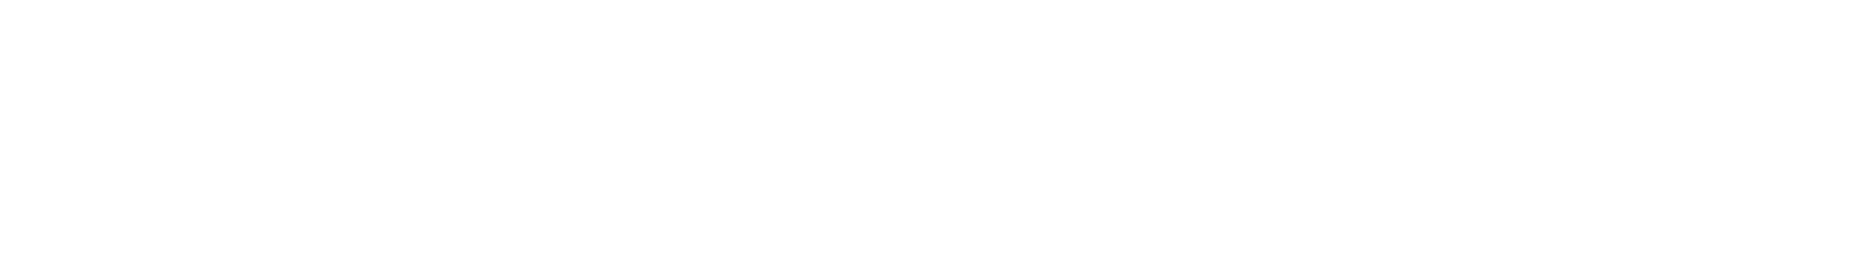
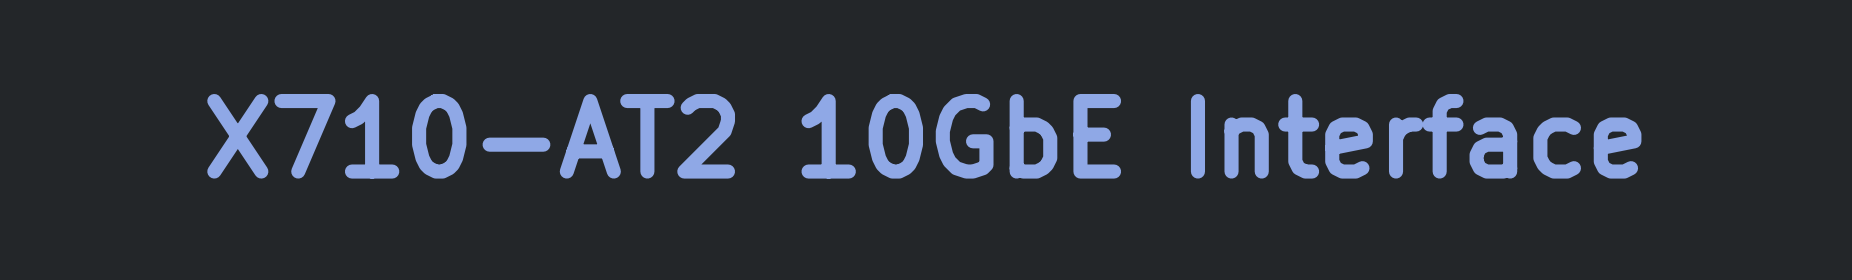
text: none -> X710-AT2 10GbE Interface (924, 136)

